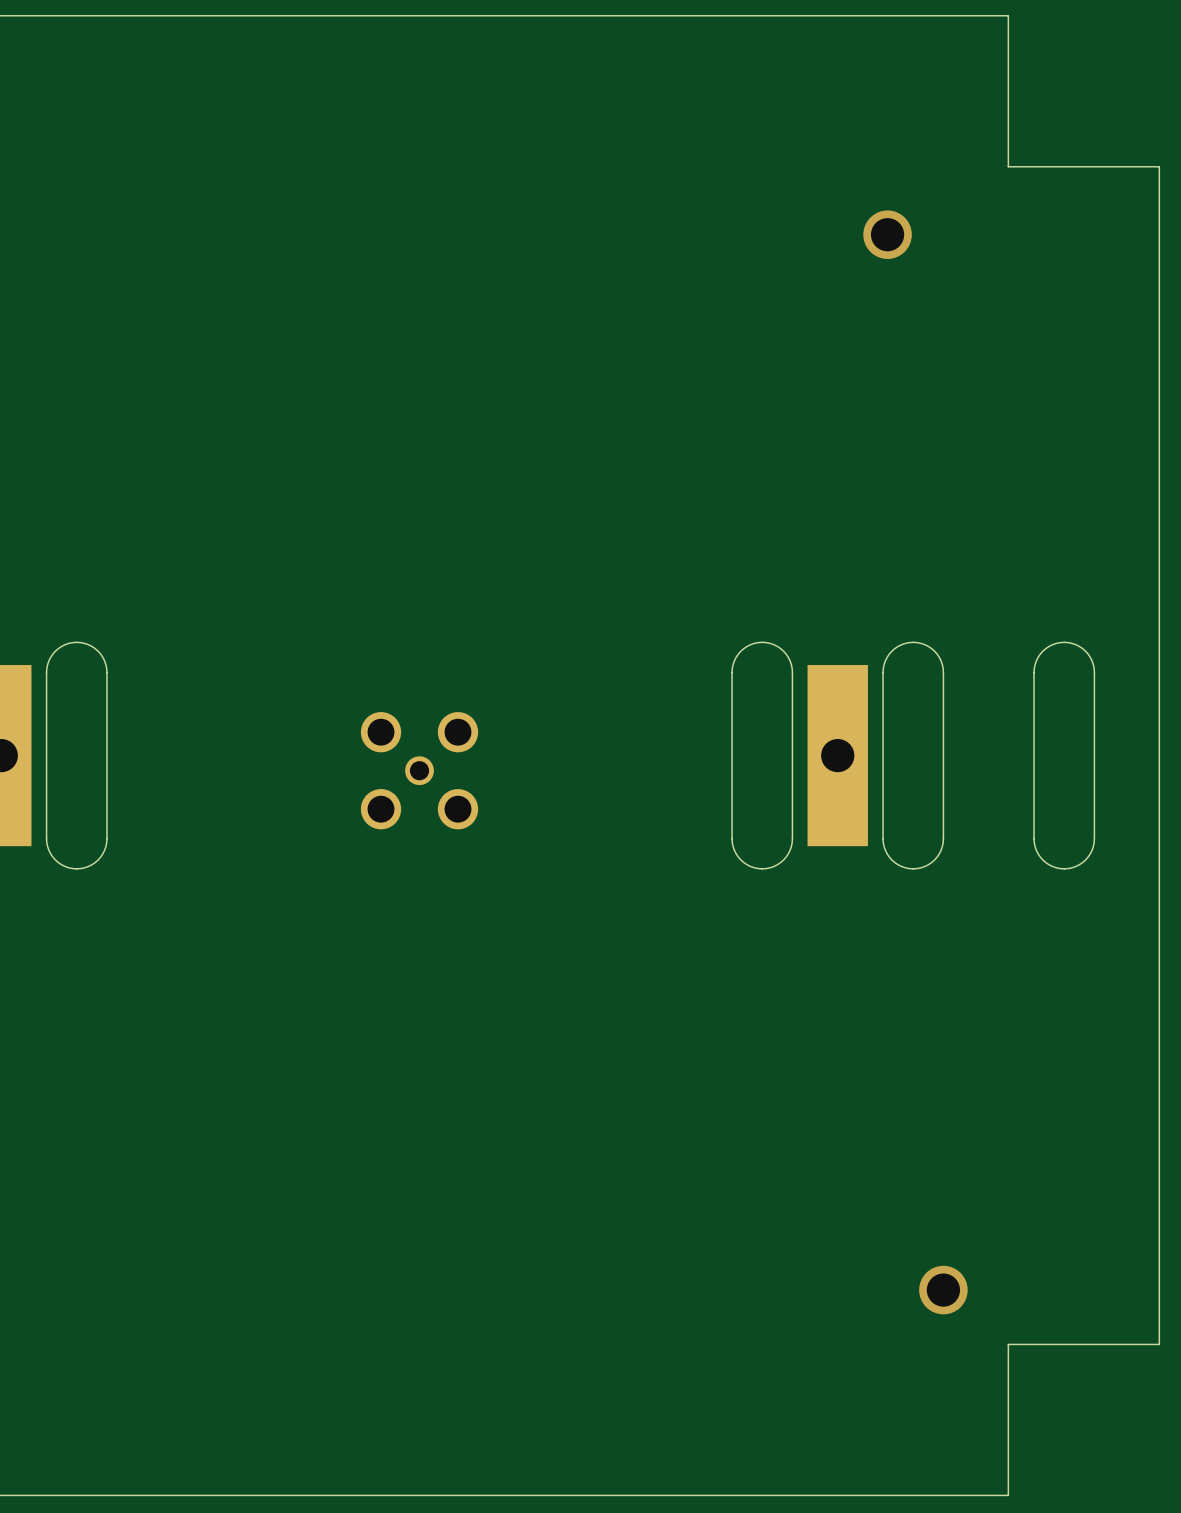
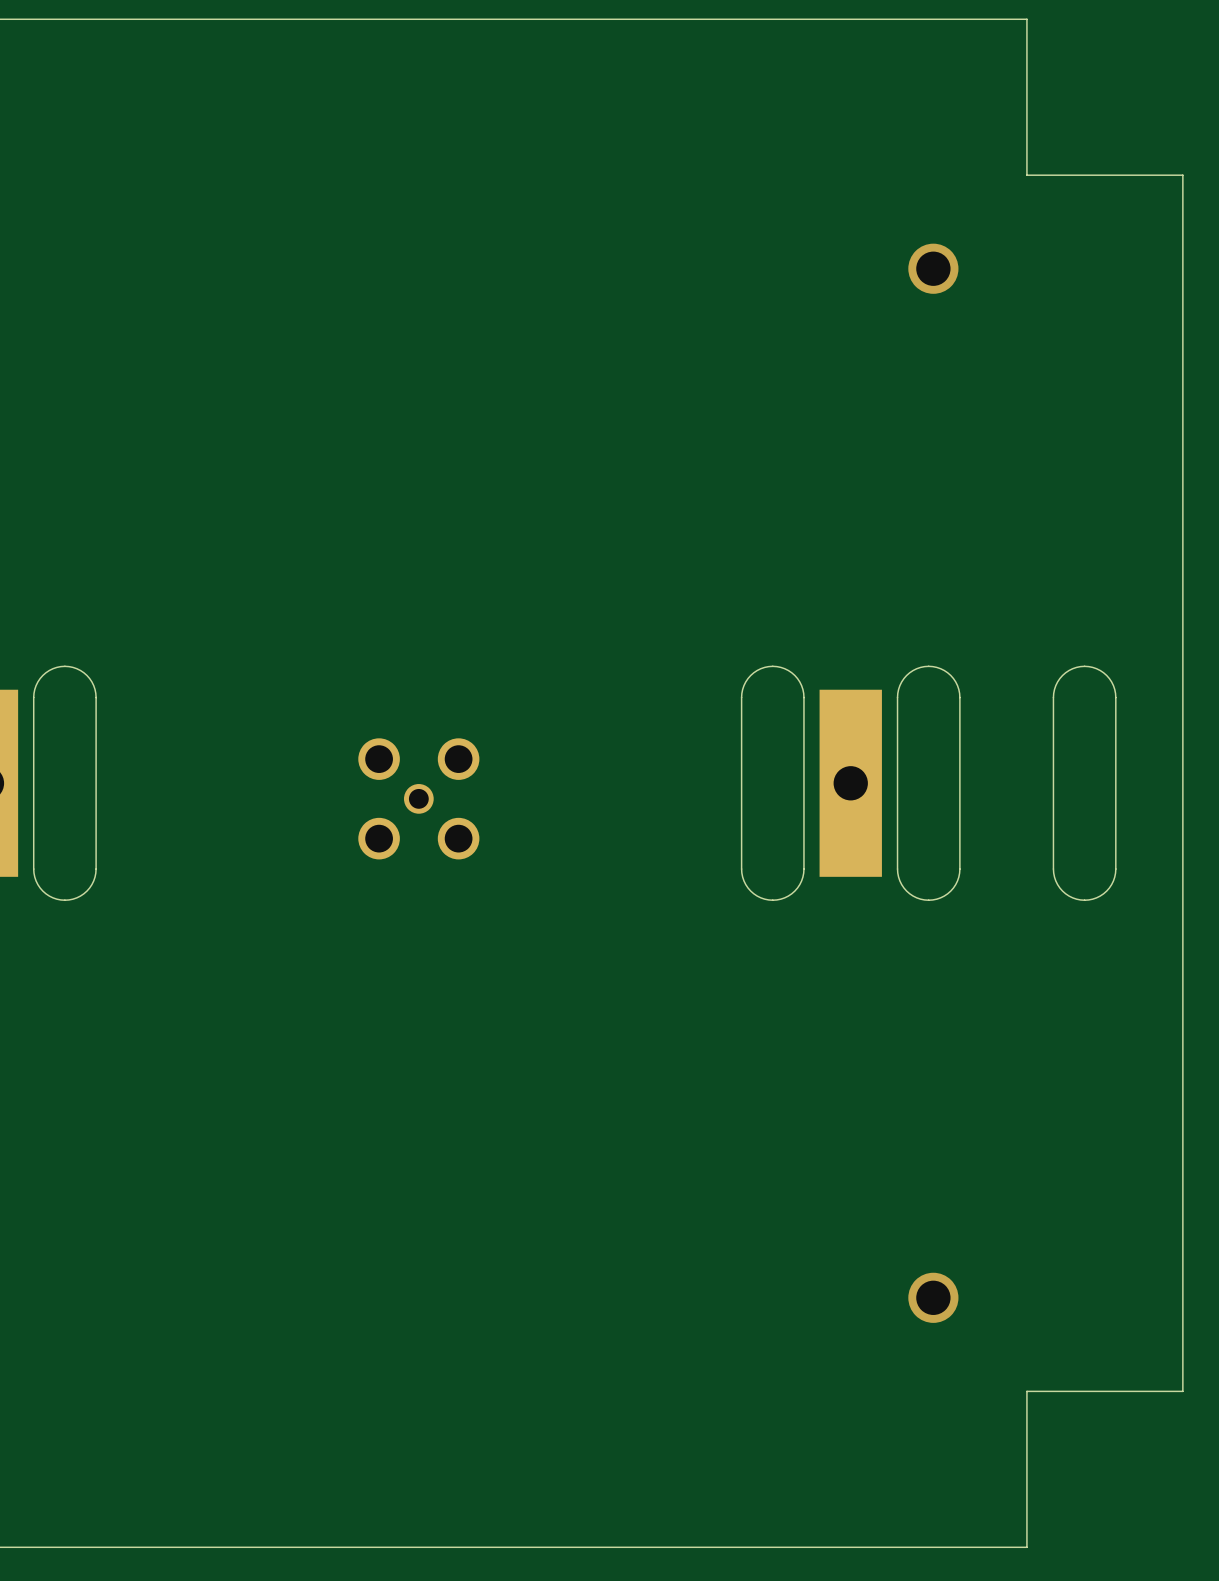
via position: (887, 234) -> (933, 268)
via position: (943, 1290) -> (933, 1297)

